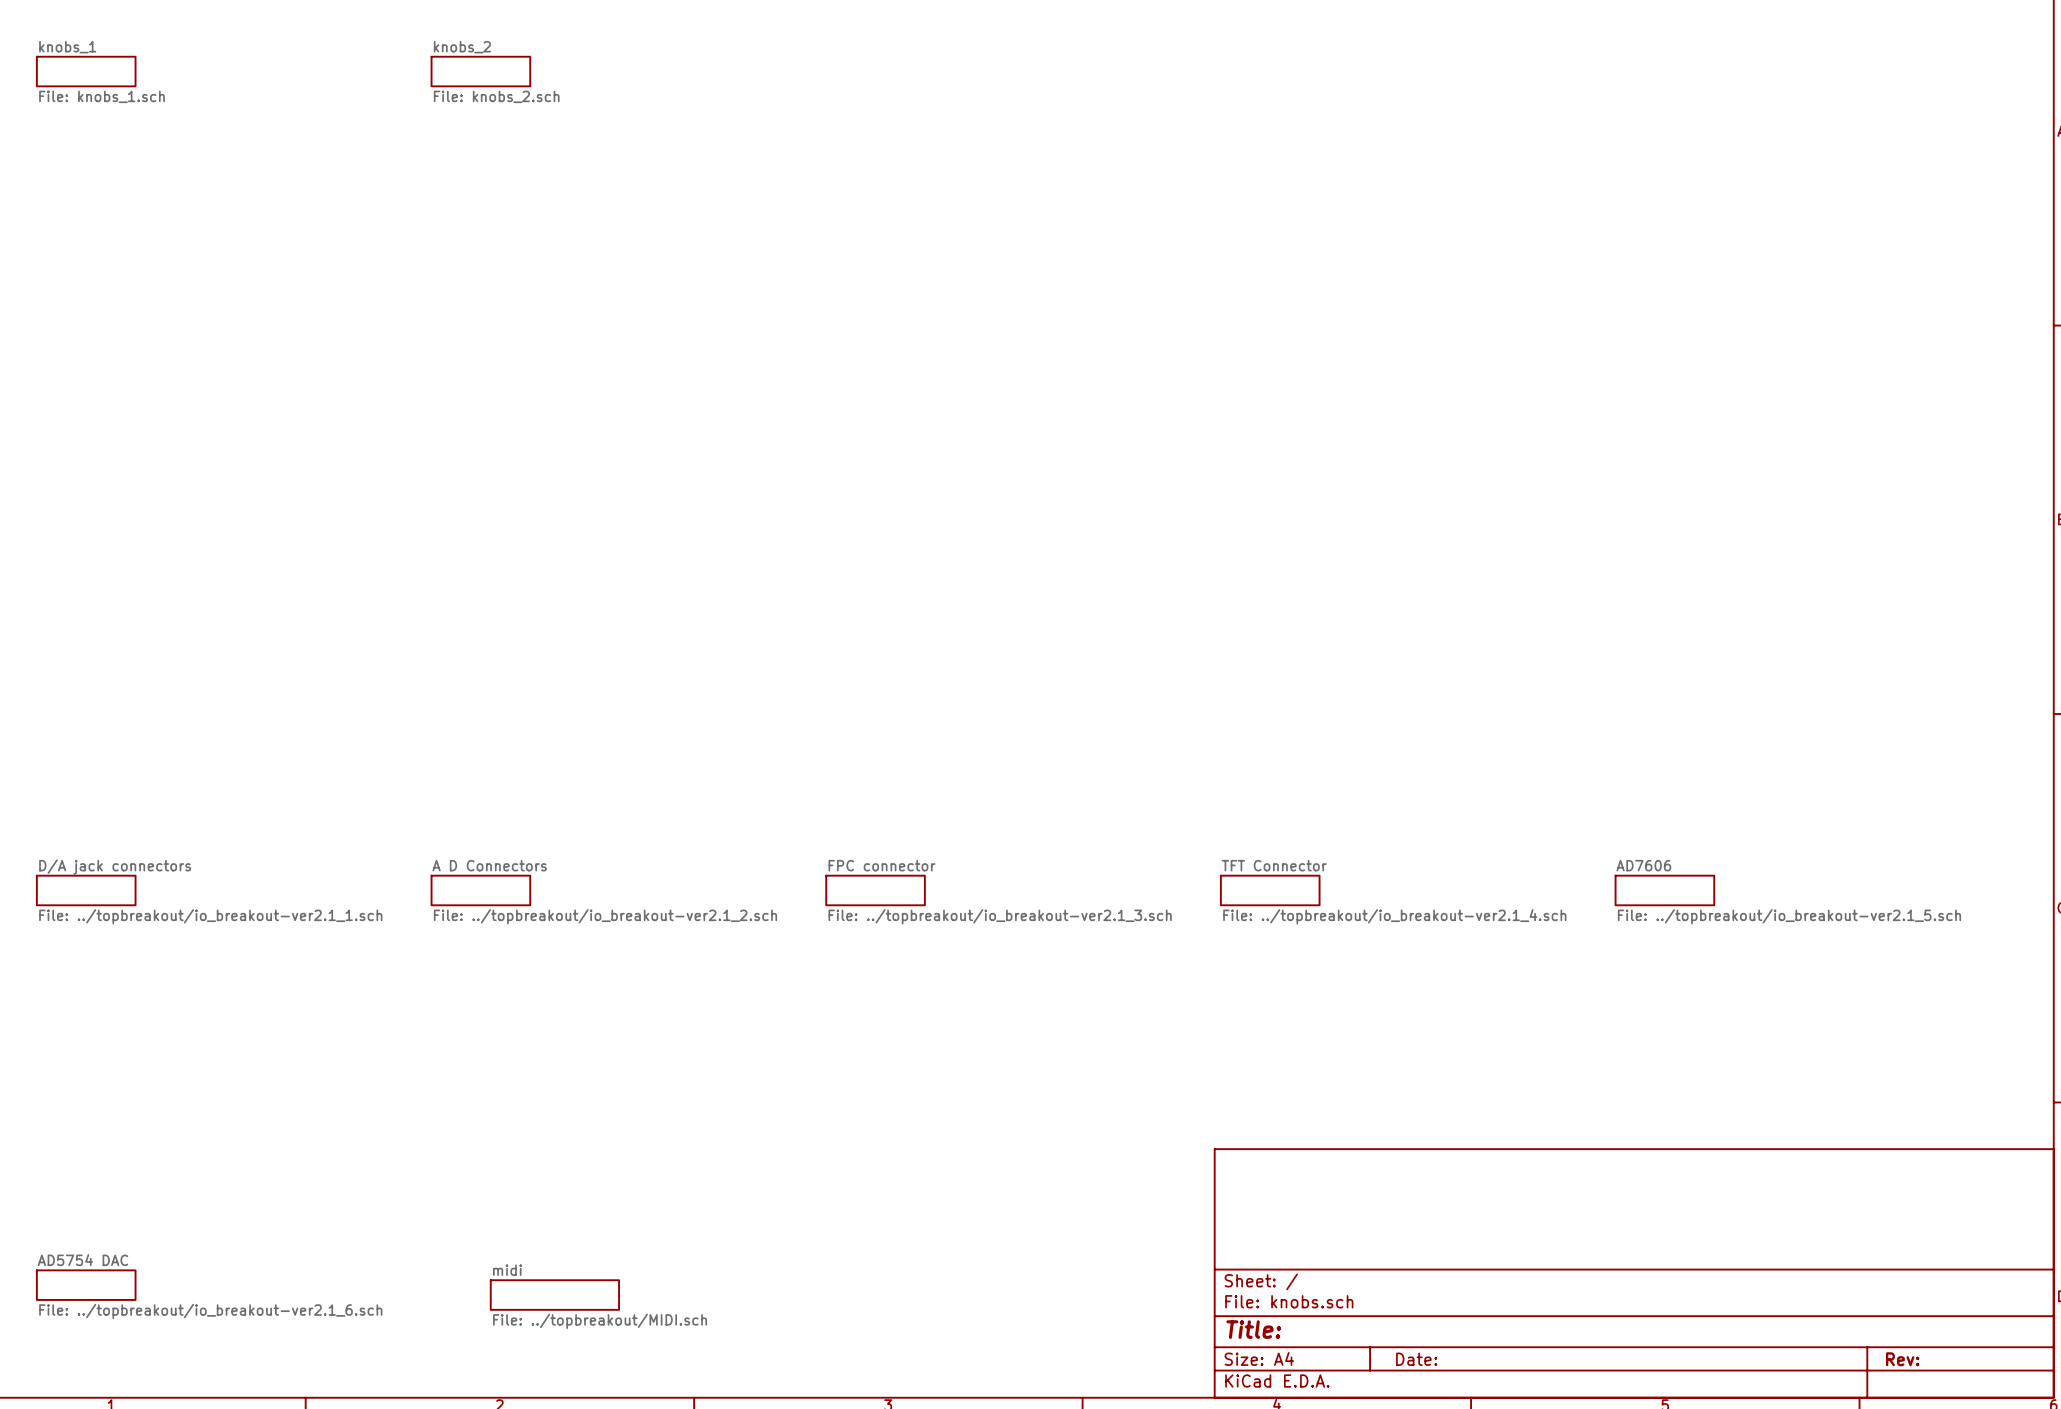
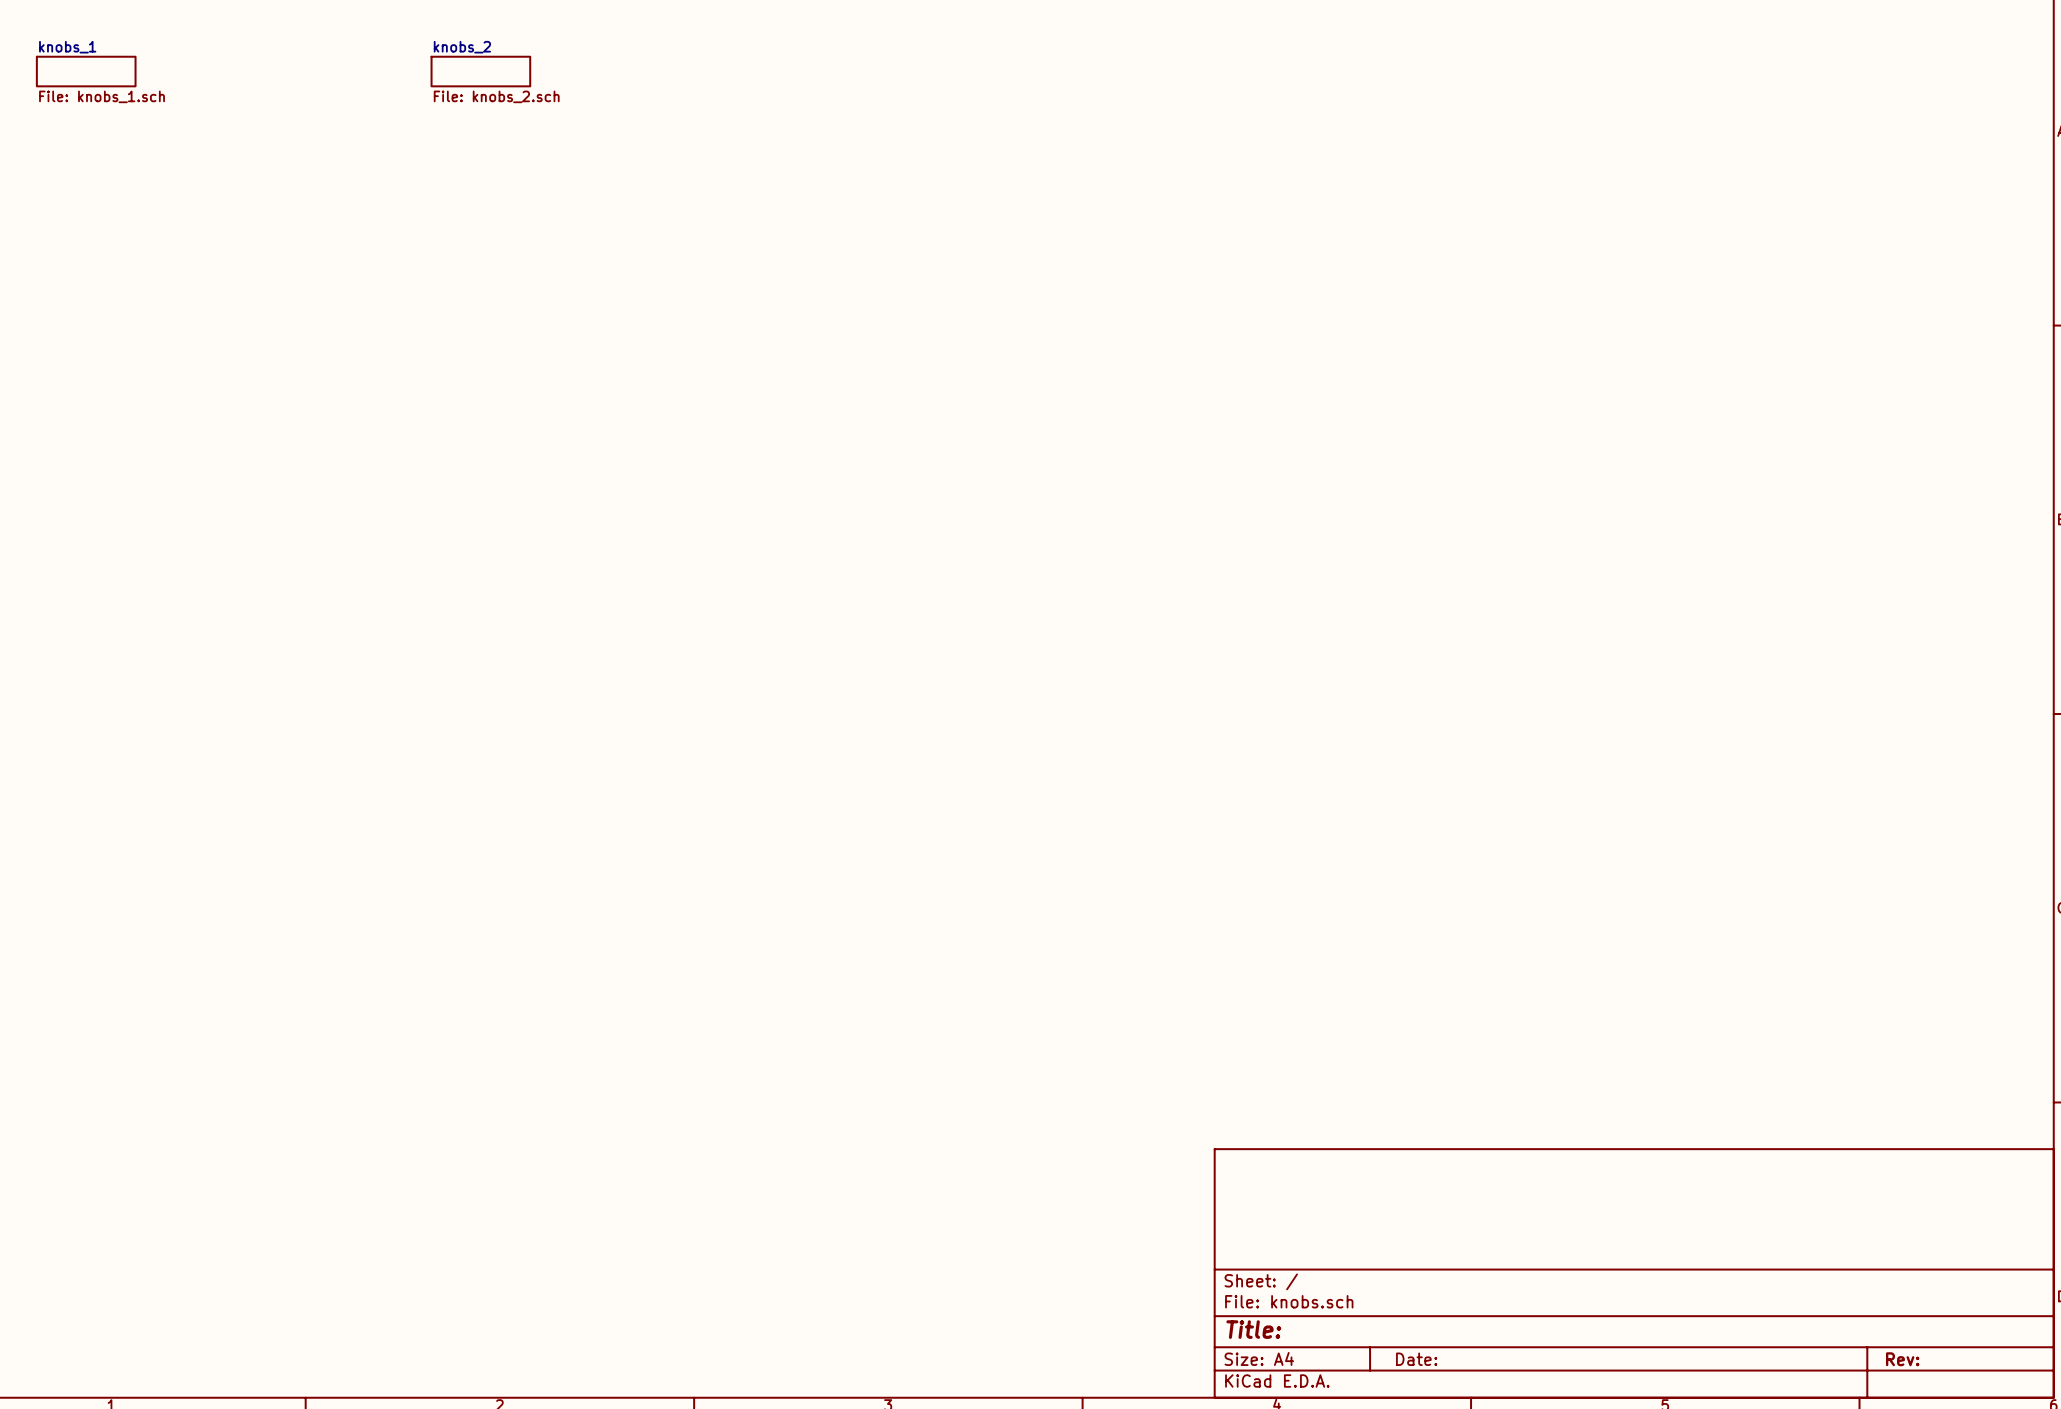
sheet D/A jack connectors: File: ../topbreakout/io_breakout-ver2.1_1.sch (86, 890) -> none
sheet A D Connectors: File: ../topbreakout/io_breakout-ver2.1_2.sch (480, 890) -> none
sheet FPC connector: File: ../topbreakout/io_breakout-ver2.1_3.sch (875, 890) -> none
sheet TFT Connector: File: ../topbreakout/io_breakout-ver2.1_4.sch (1270, 890) -> none
sheet AD7606: File: ../topbreakout/io_breakout-ver2.1_5.sch (1664, 890) -> none
sheet AD5754 DAC: File: ../topbreakout/io_breakout-ver2.1_6.sch (86, 1285) -> none
sheet midi: File: ../topbreakout/MIDI.sch (554, 1295) -> none

